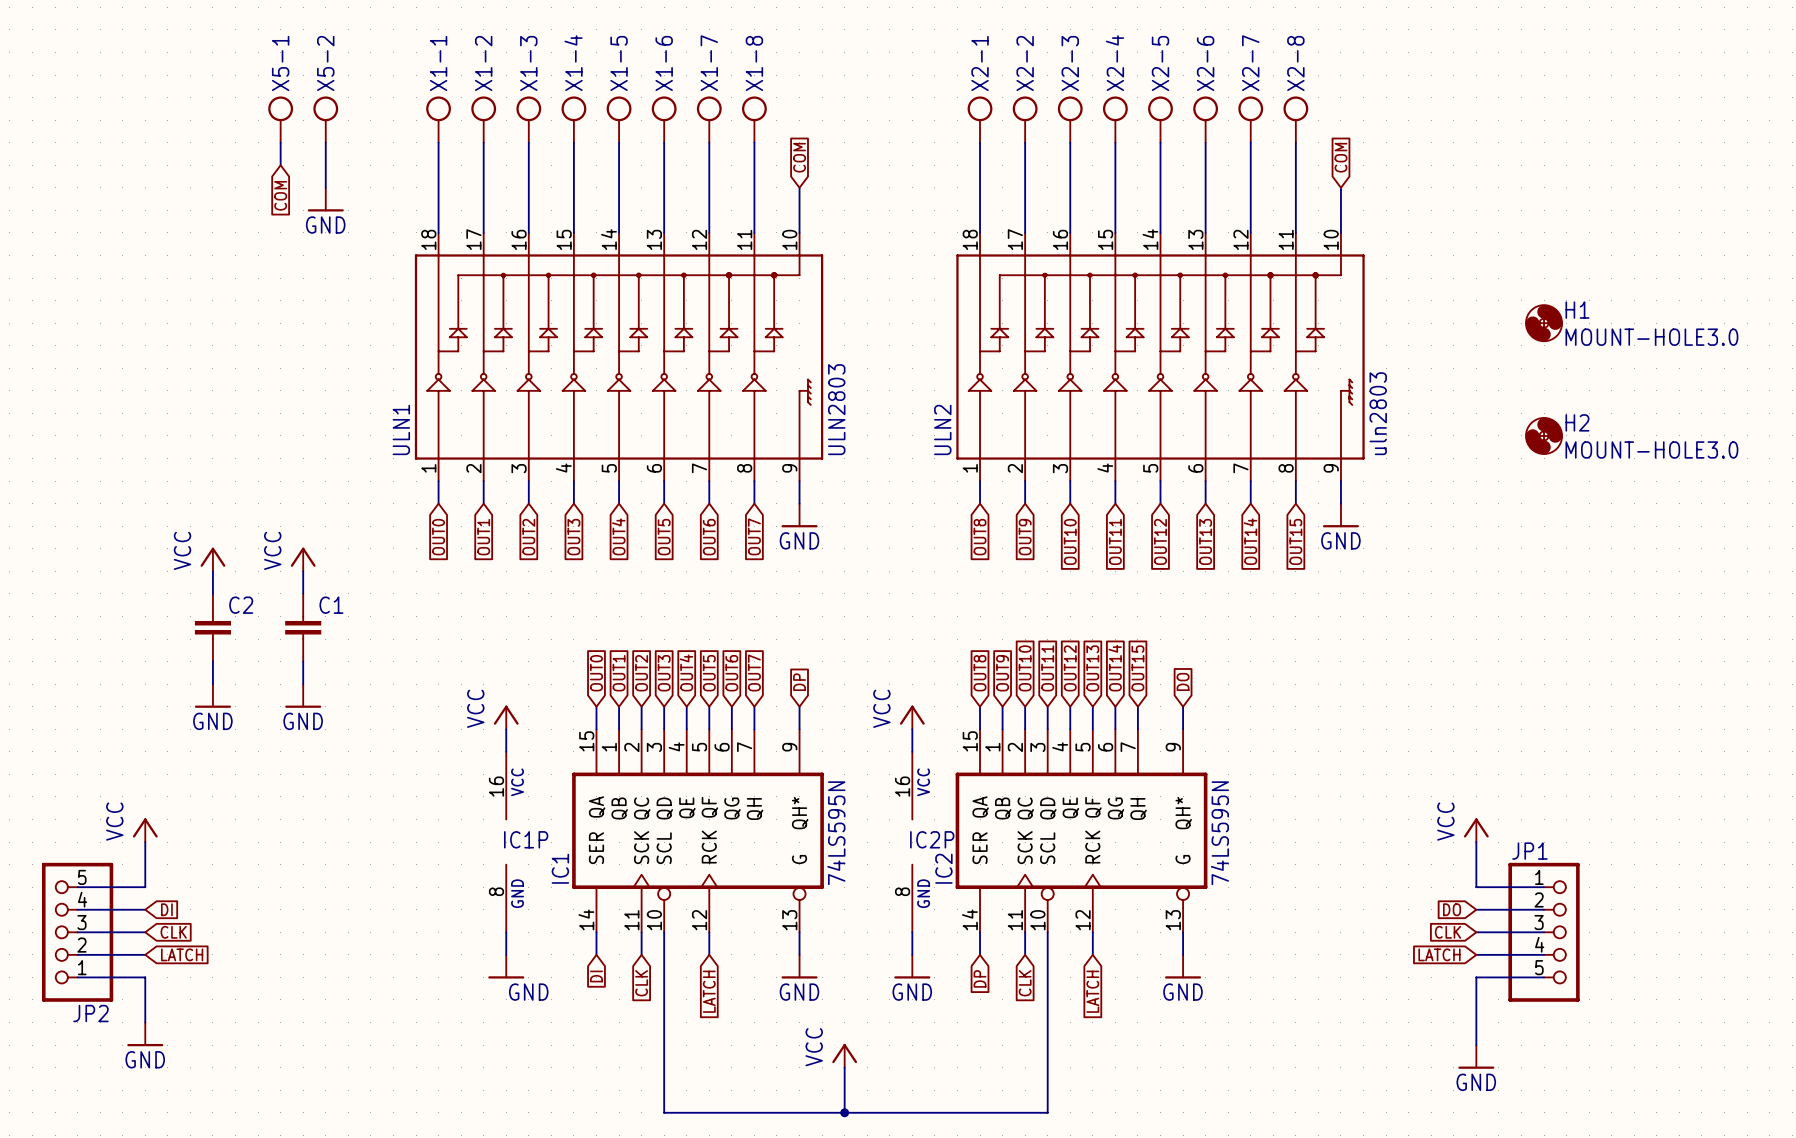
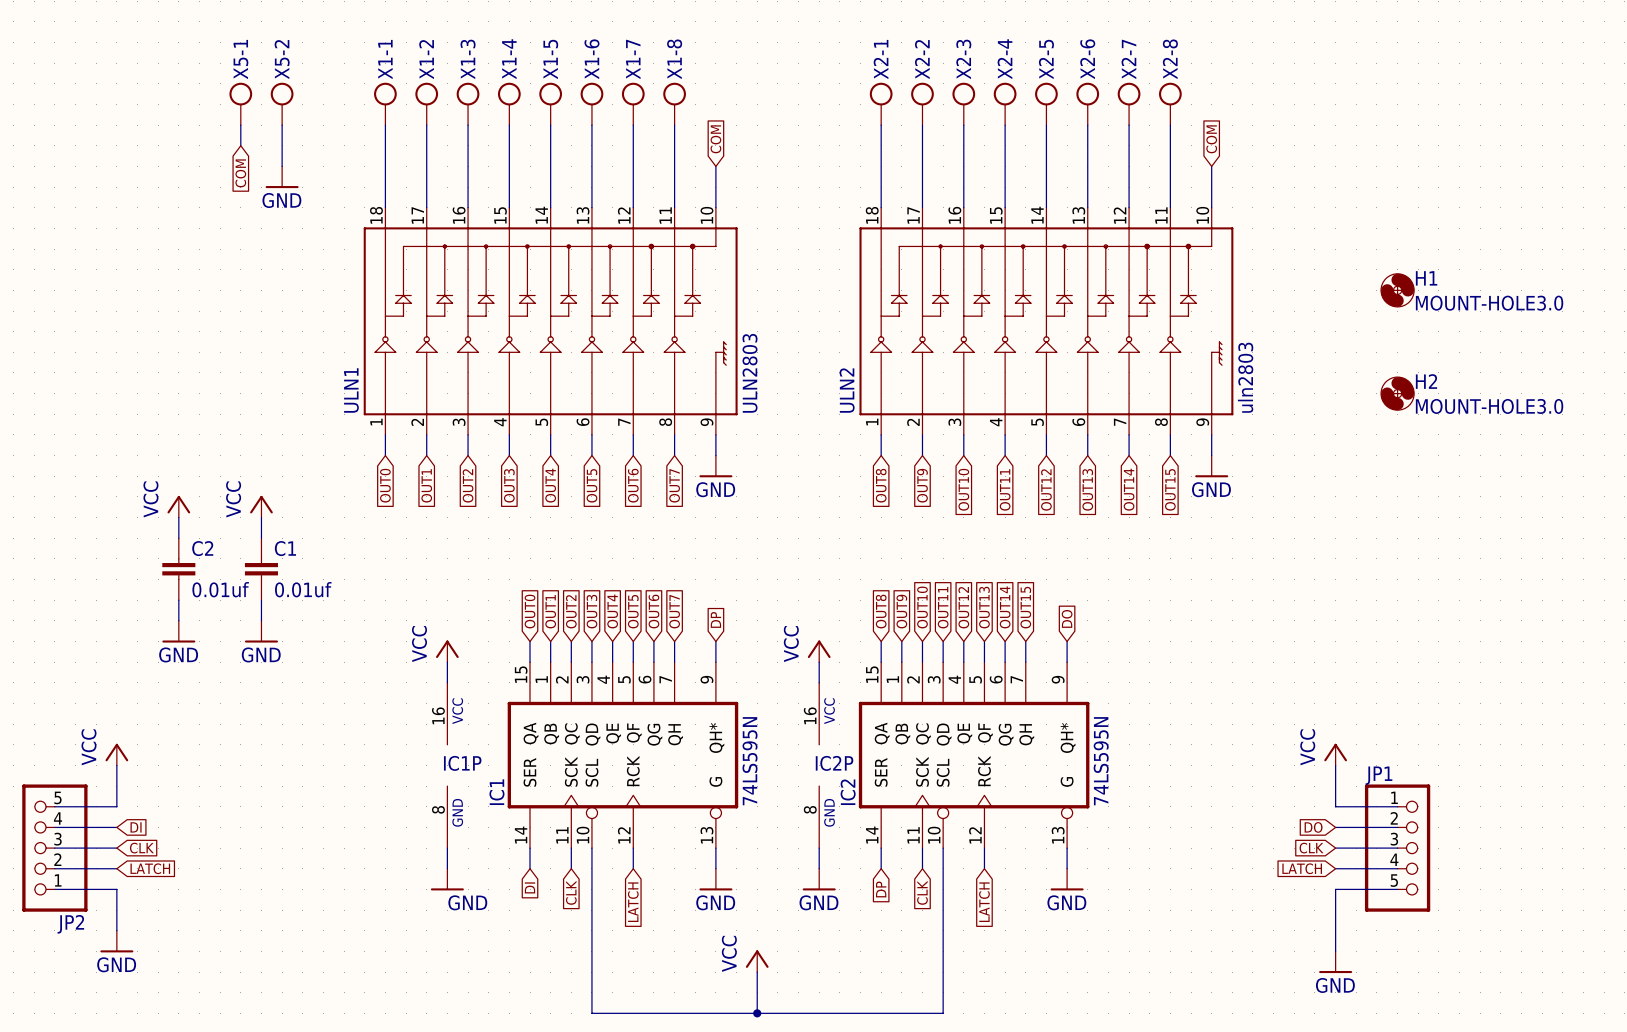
C2 value: none -> 0.01uf (220, 589)
C1 value: none -> 0.01uf (303, 589)

